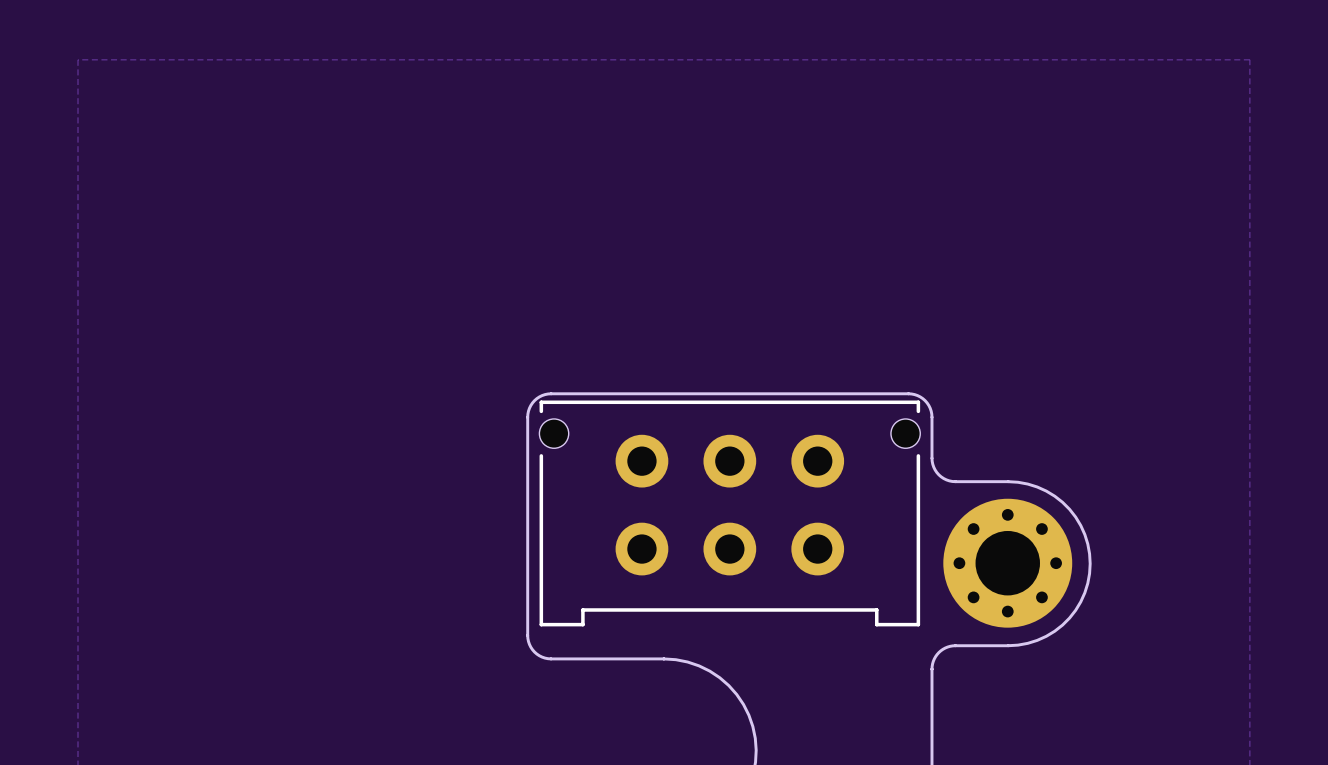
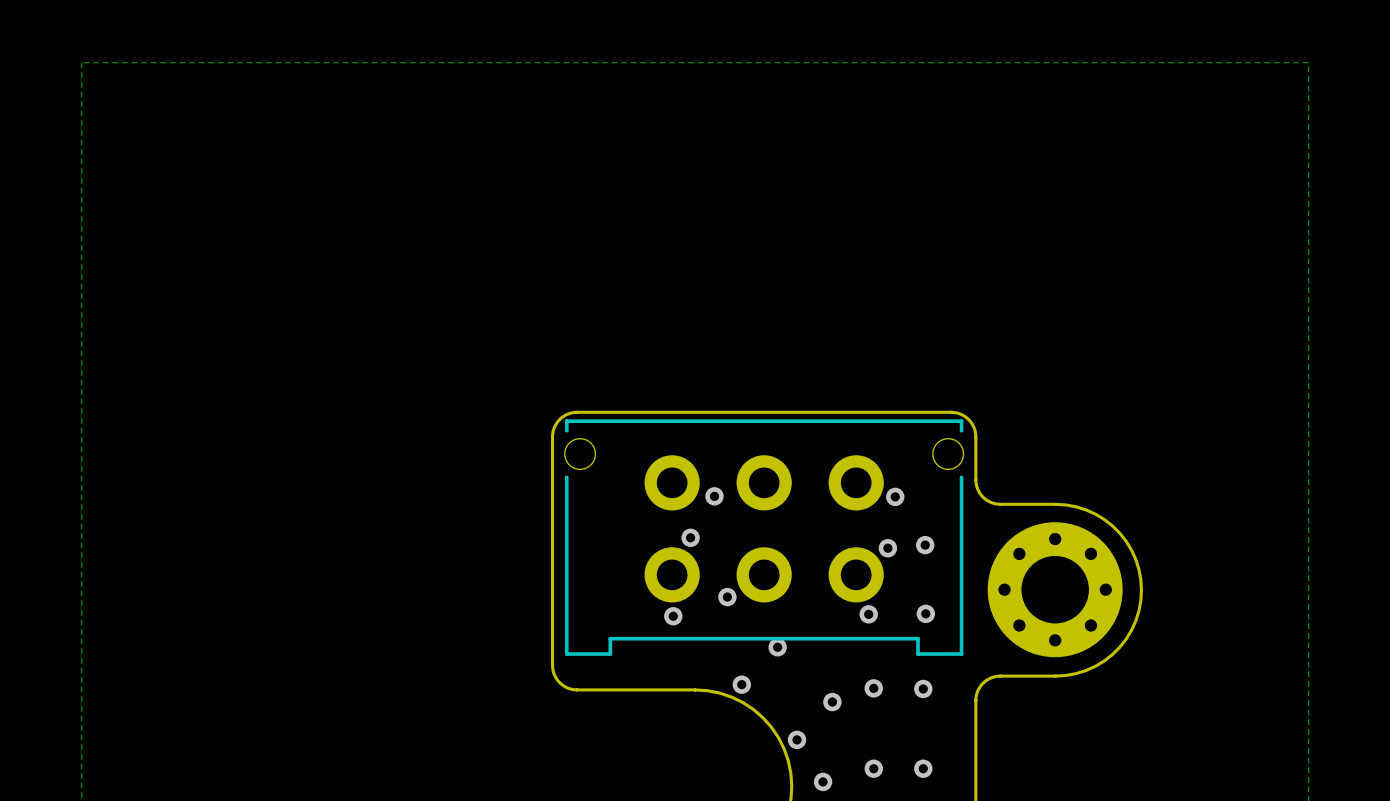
via: none -> (714, 496)
via: none -> (895, 496)
via: none -> (690, 537)
via: none -> (925, 545)
via: none -> (887, 548)
via: none -> (727, 597)
via: none -> (868, 614)
via: none -> (925, 613)
via: none -> (673, 616)
via: none -> (777, 647)
via: none -> (741, 684)
via: none -> (873, 688)
via: none -> (923, 688)
via: none -> (832, 702)
via: none -> (797, 739)
via: none -> (873, 768)
via: none -> (923, 768)
via: none -> (823, 781)

